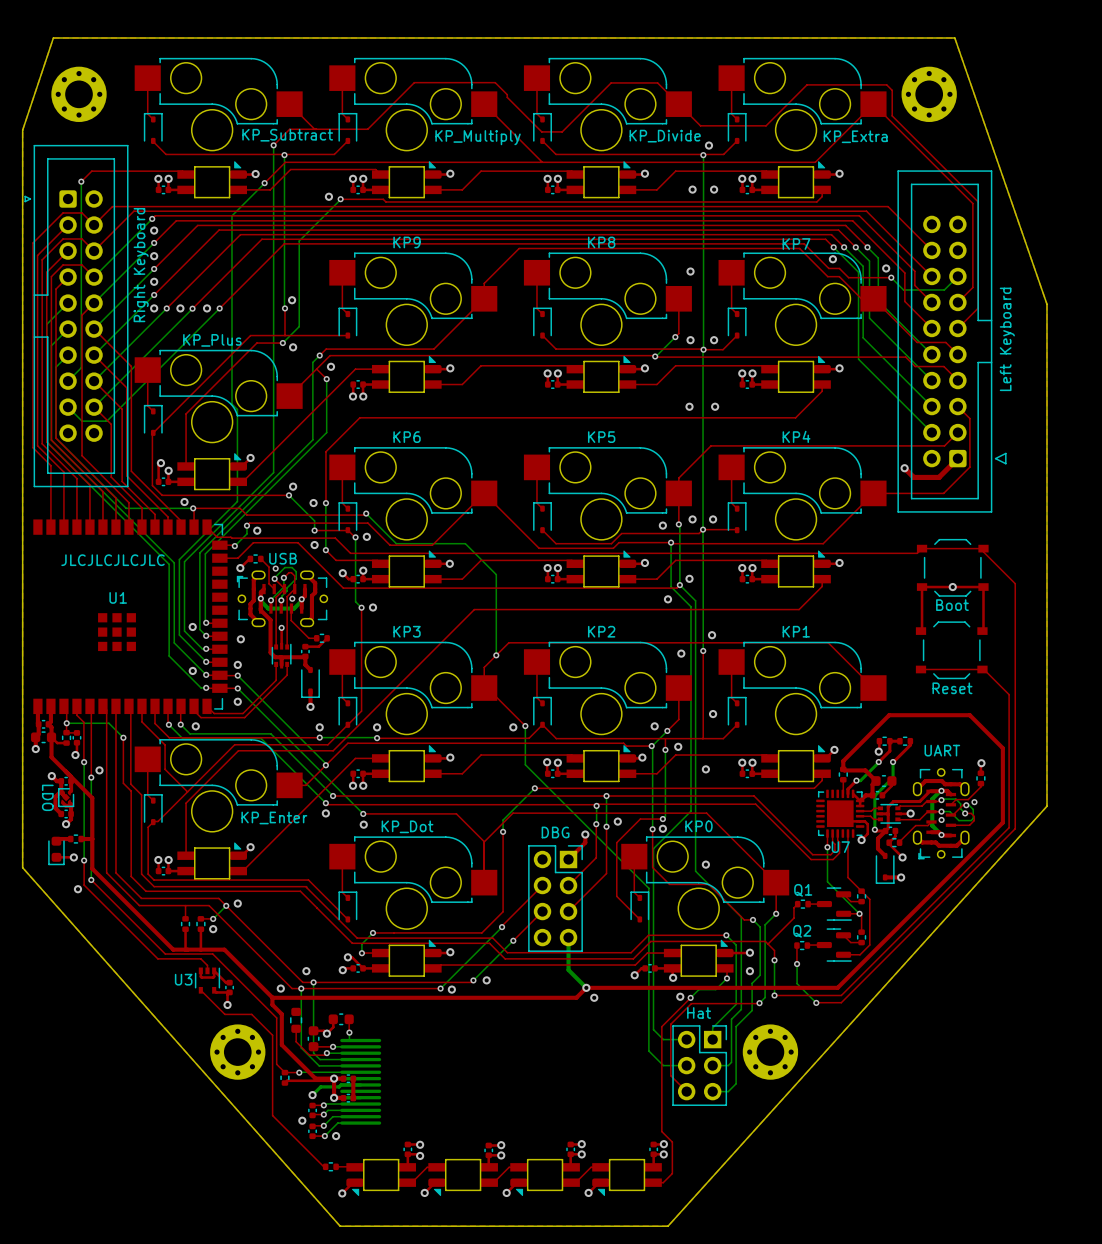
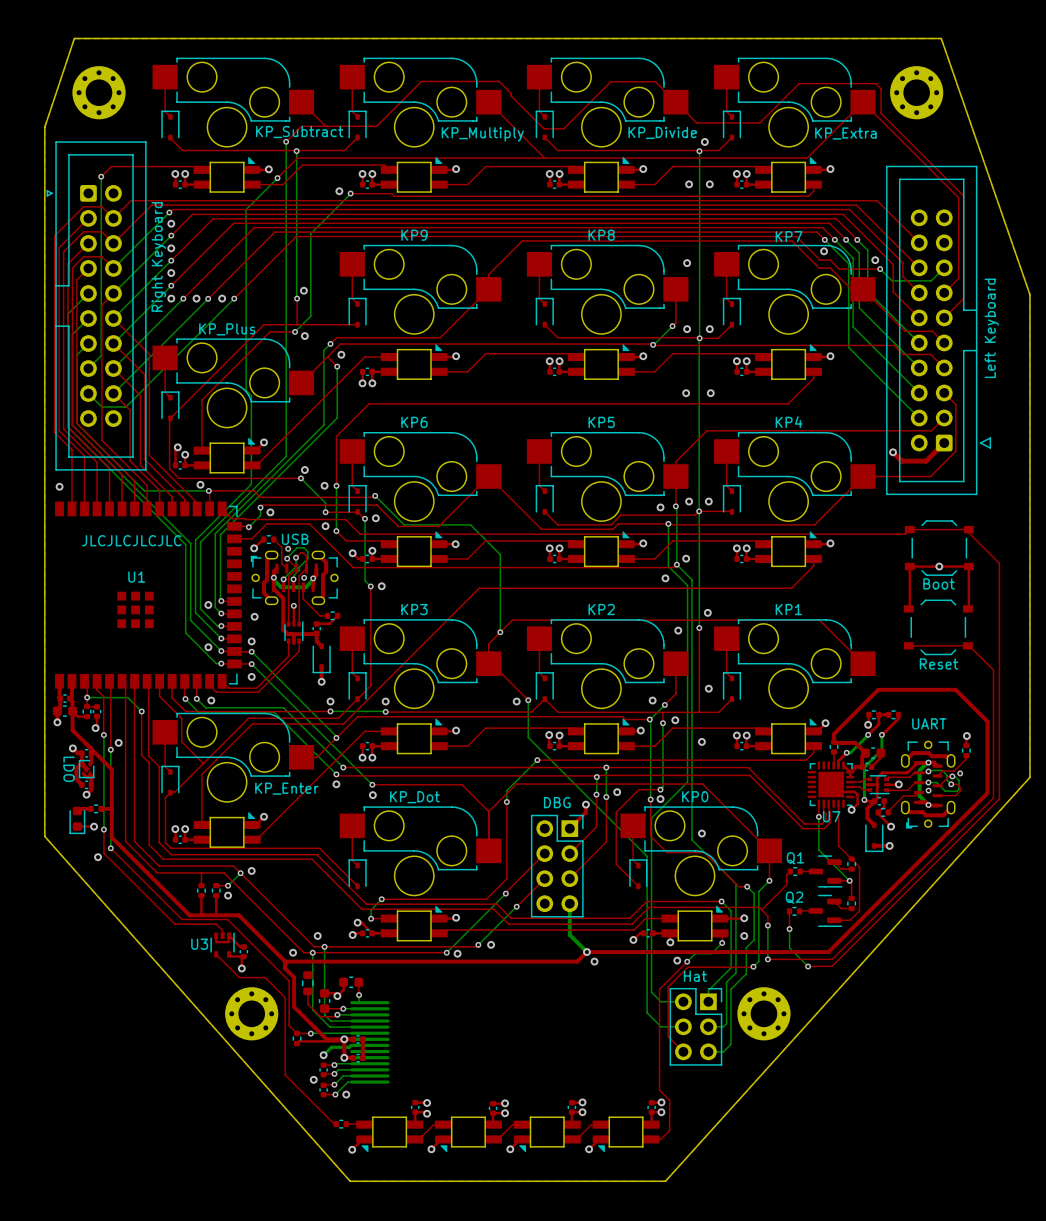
via: none -> (59, 486)

